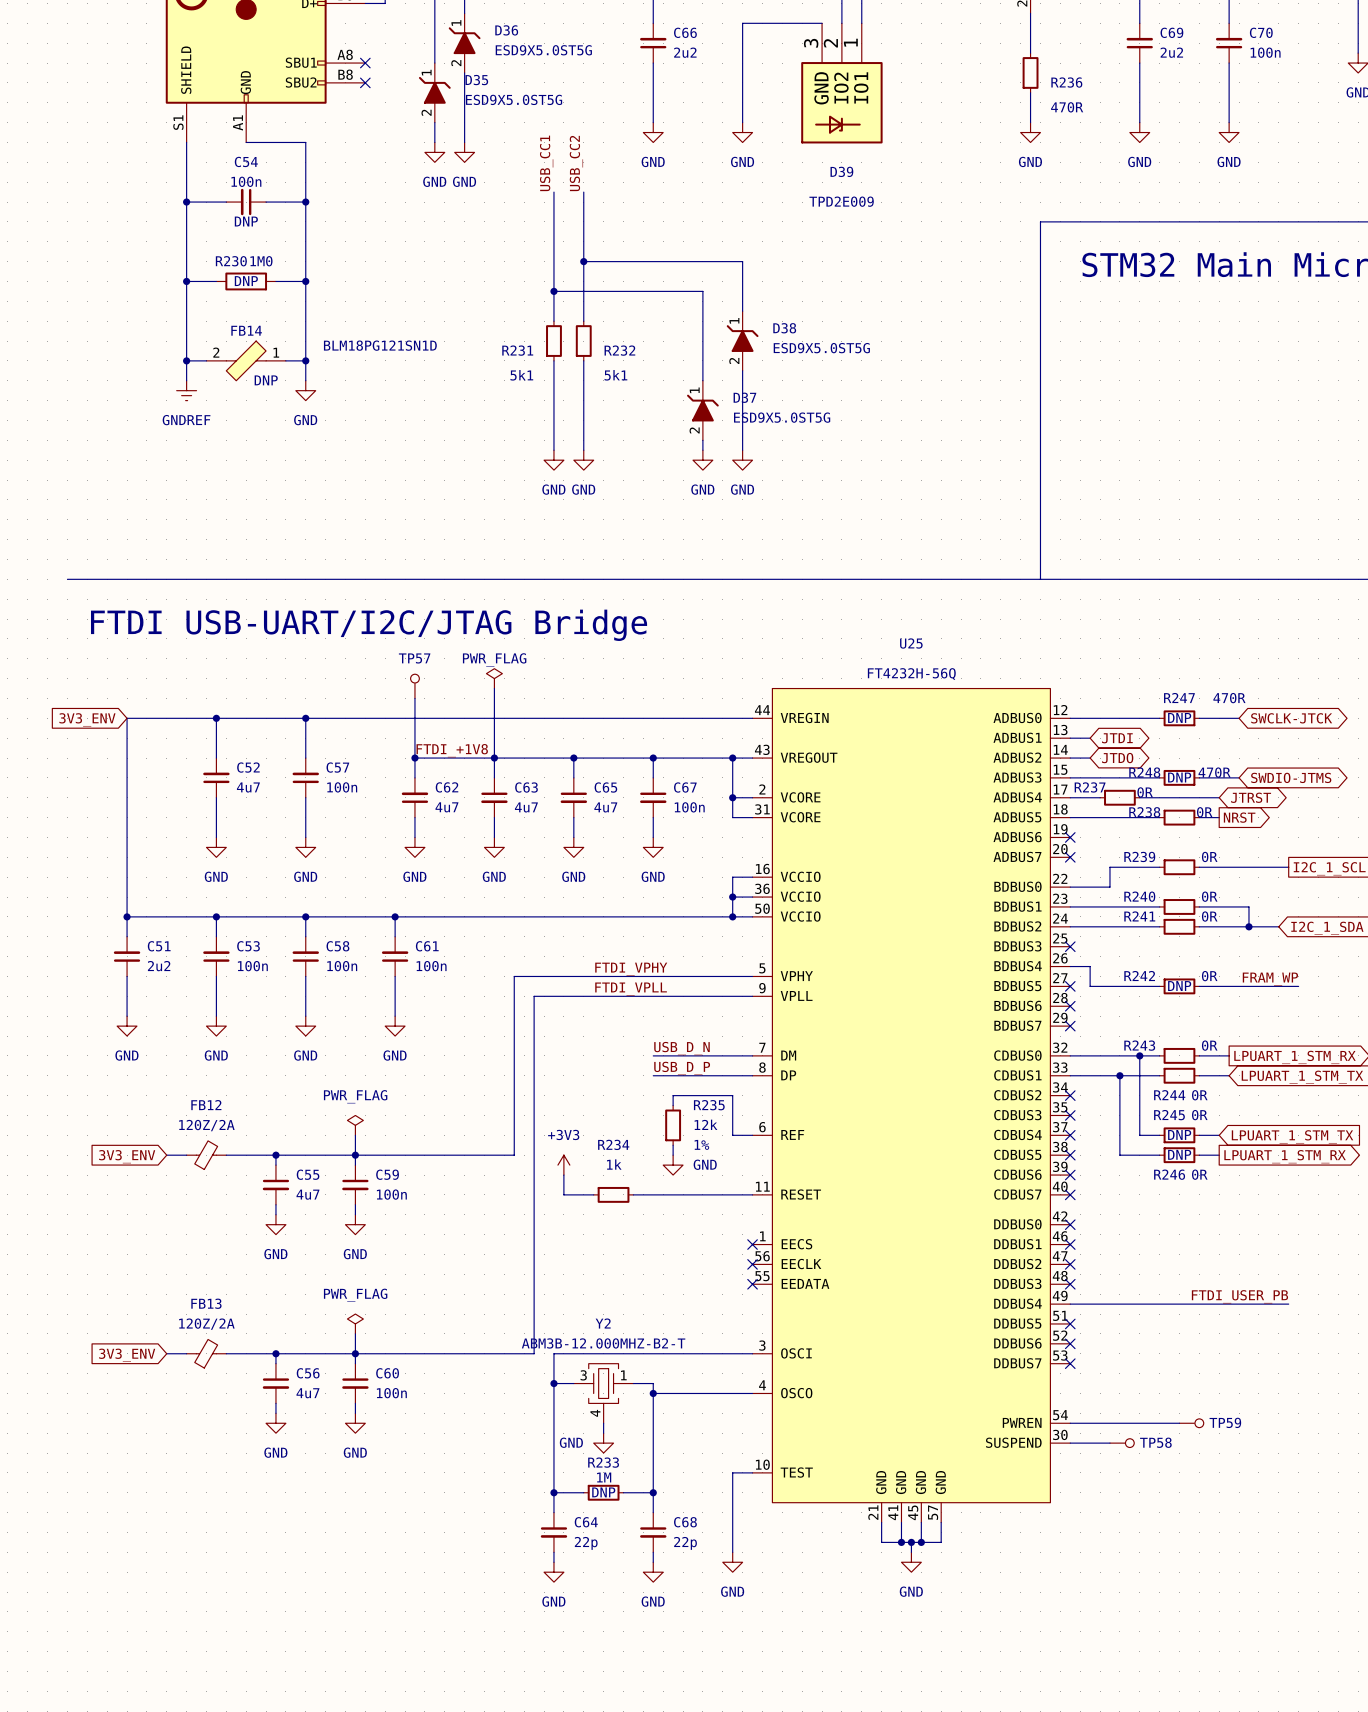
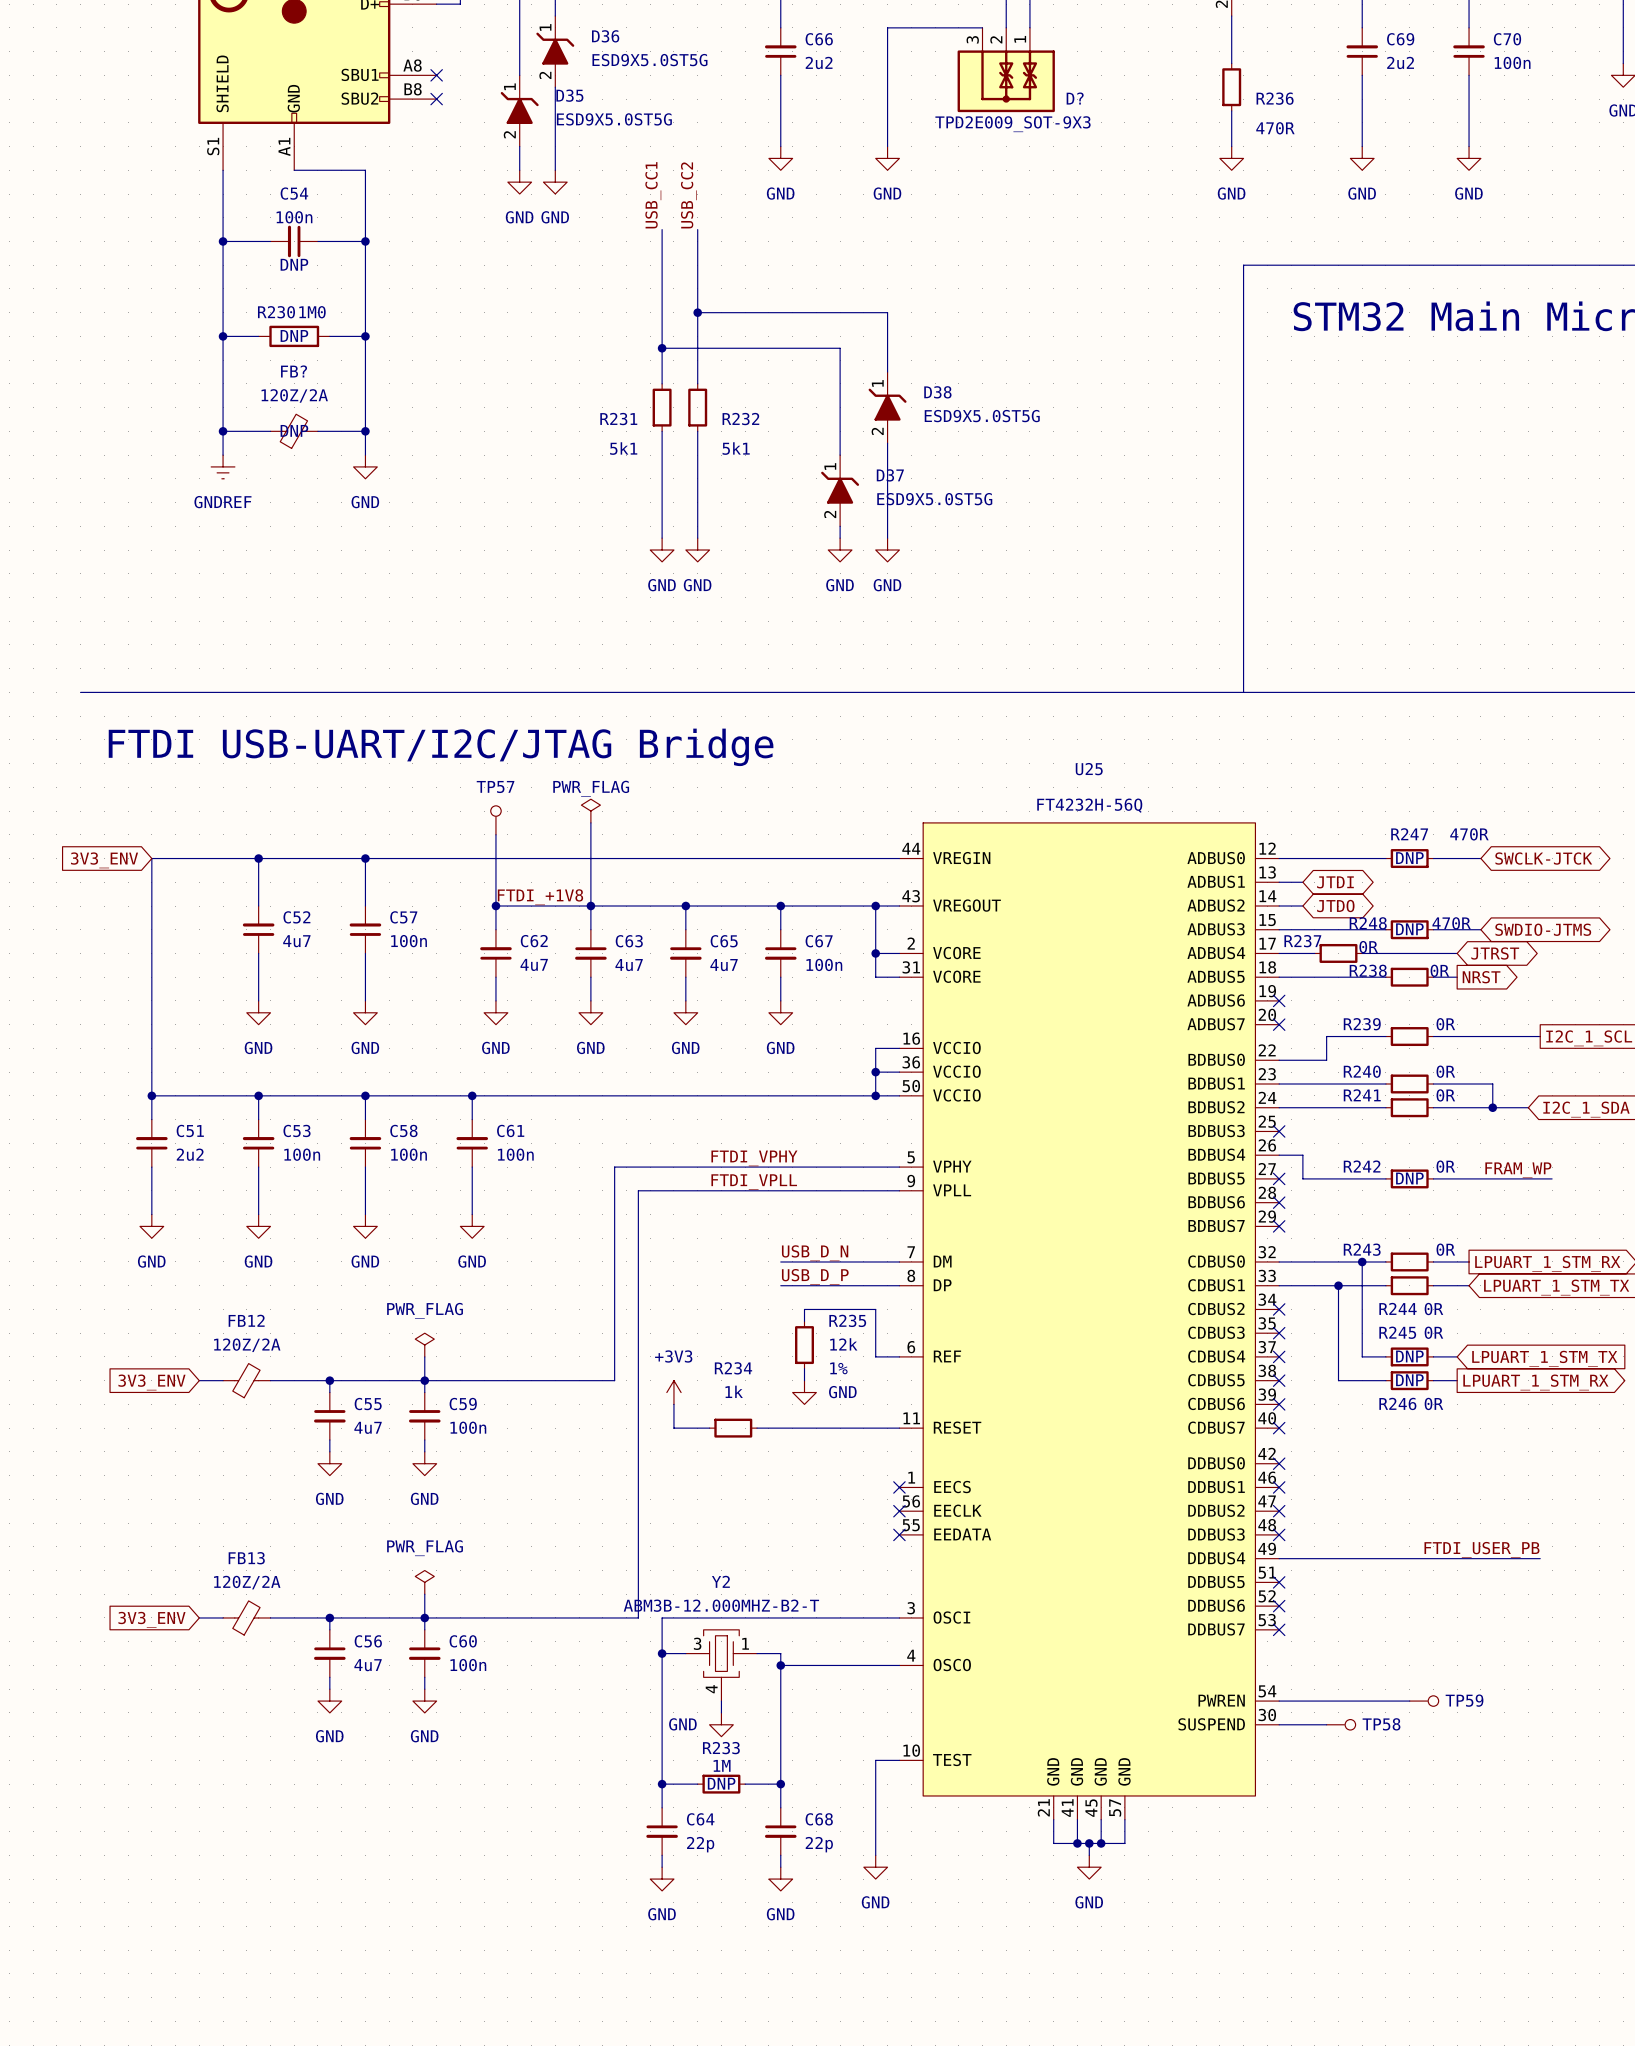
D?: none -> TPD2E009_SOT-9X3 (1006, 70)
D39: TPD2E009 (841, 83) -> none
FB14: BLM18PG121SN1D (246, 360) -> none
FB?: none -> (294, 431)

